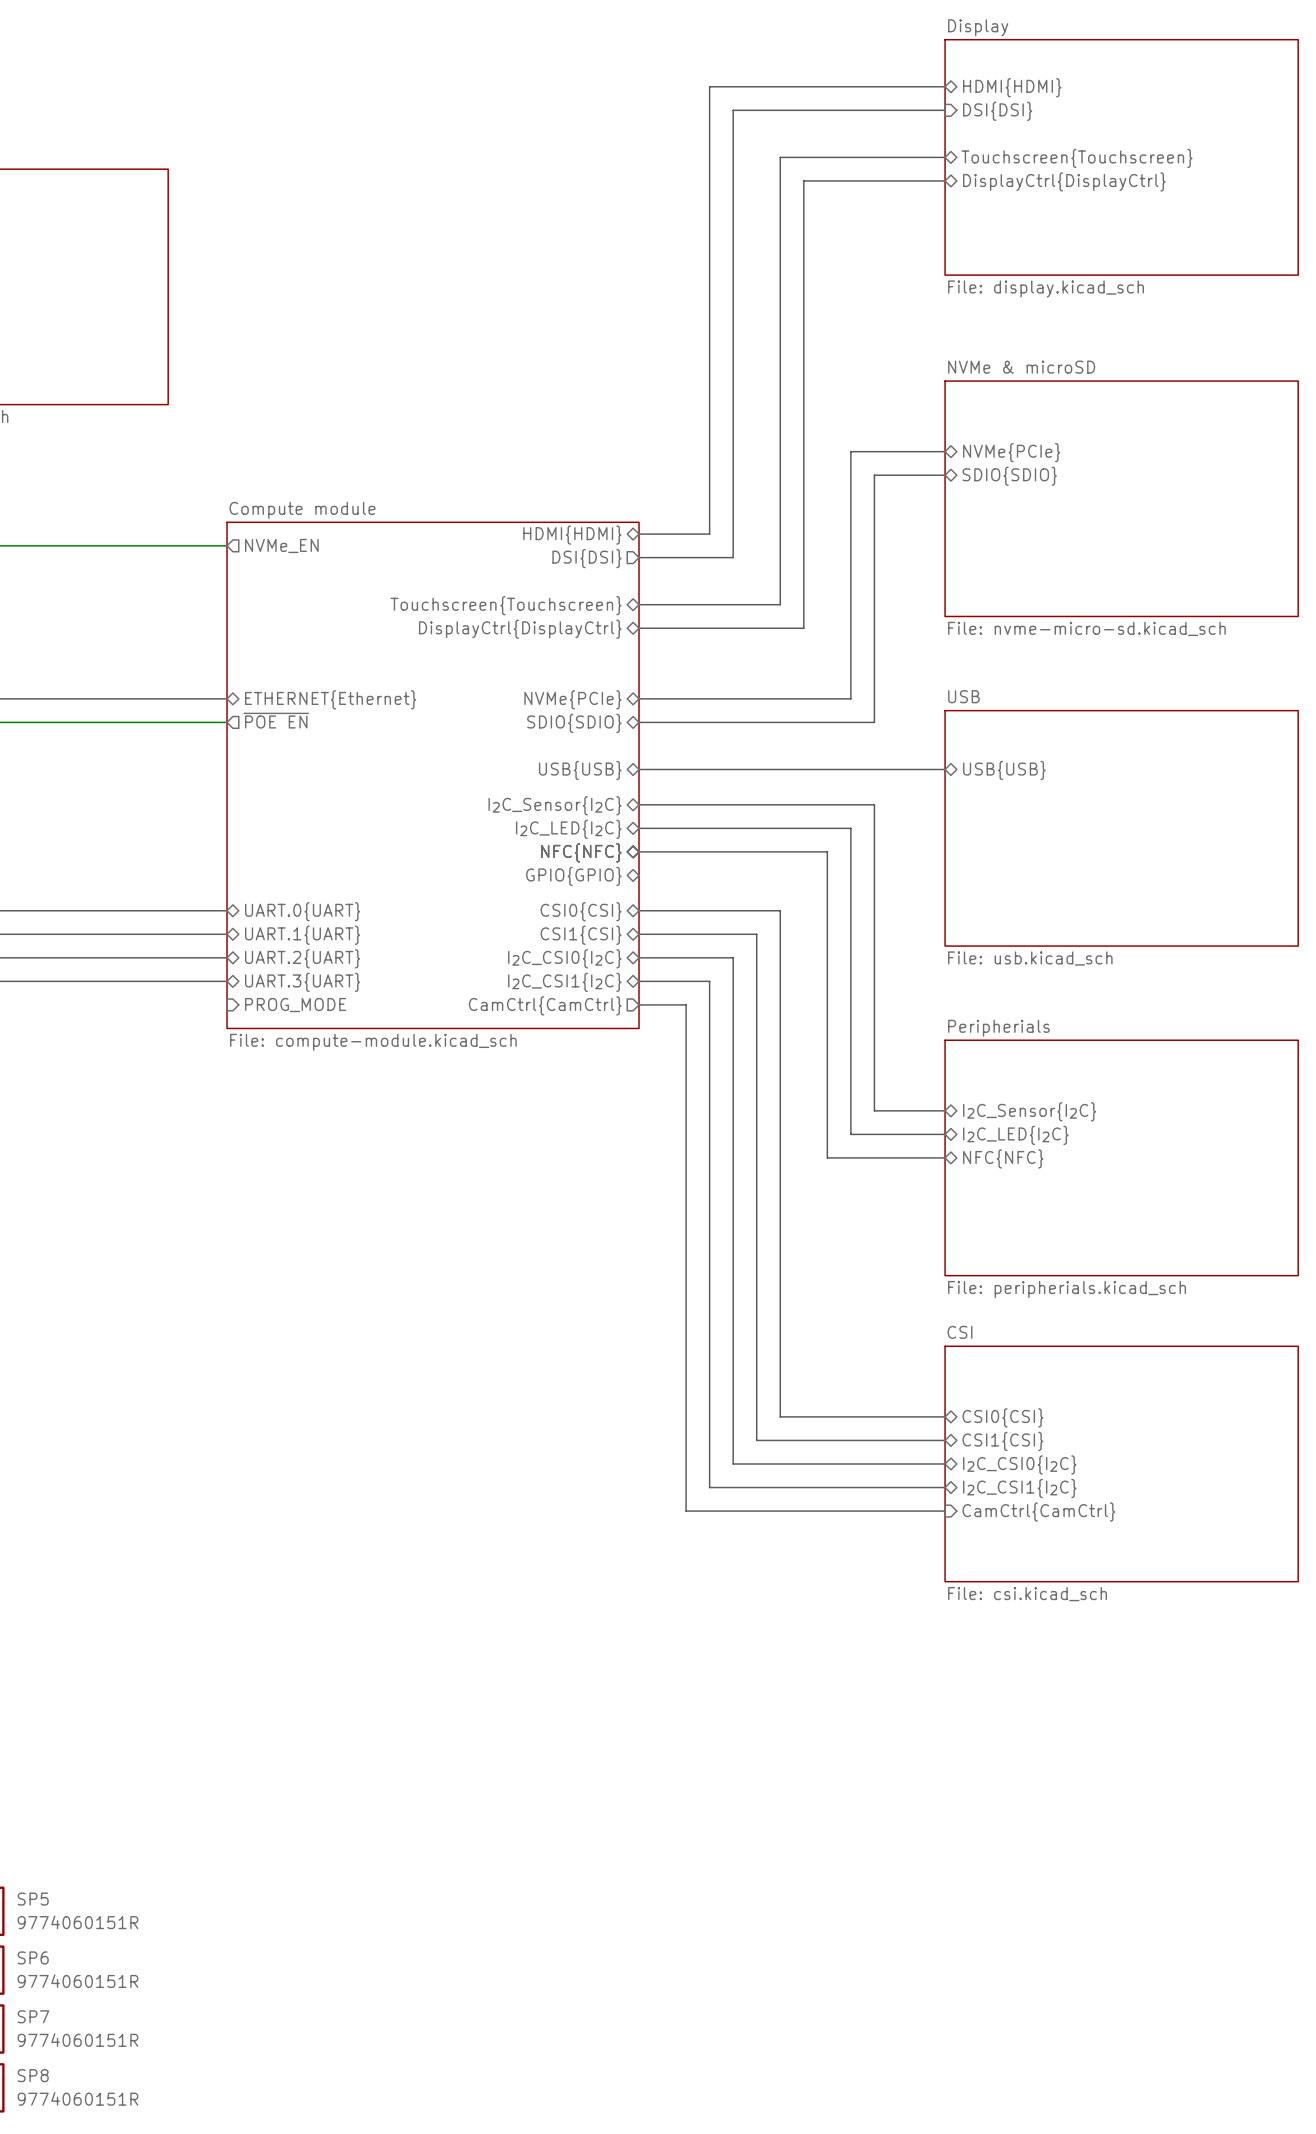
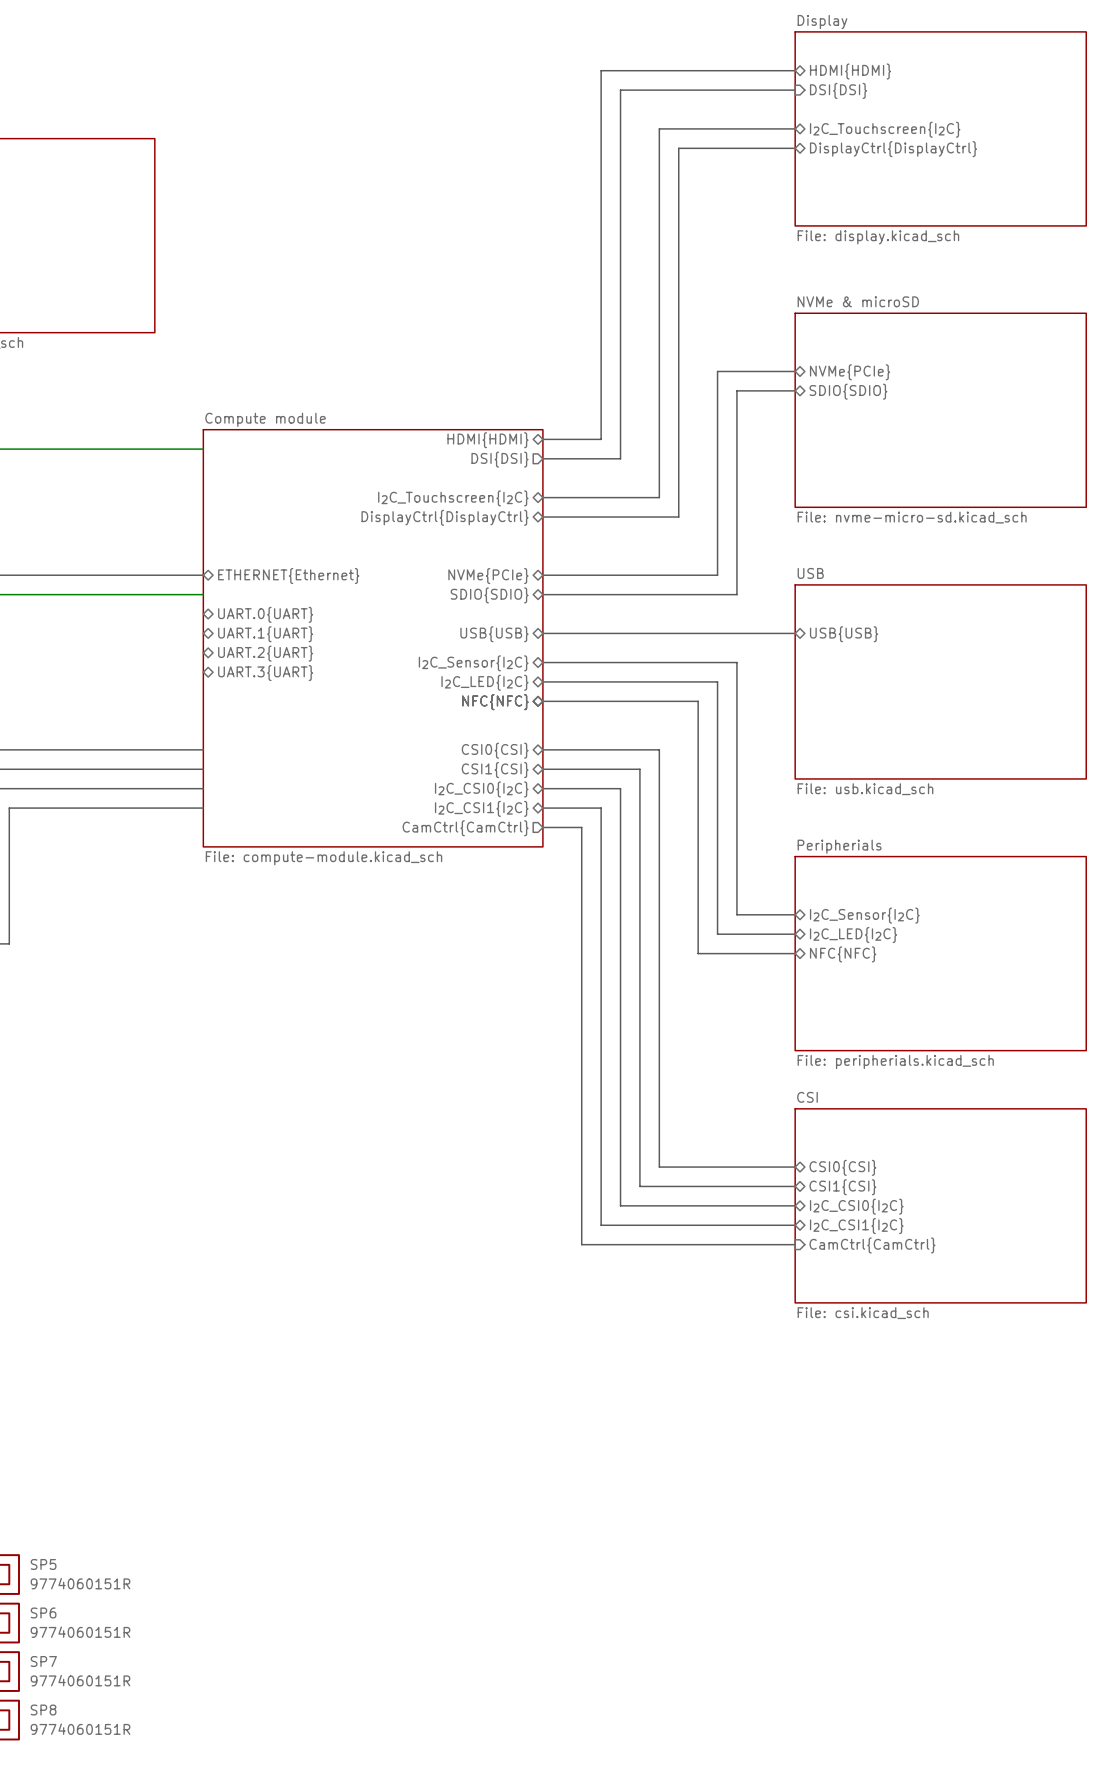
sheet pin: Touchscreen{Touchscreen} (1076, 158) -> I2C_Touchscreen{I2C} (885, 129)
sheet pin: NVMe_EN (281, 545) -> none
sheet pin: Touchscreen{Touchscreen} (505, 605) -> I2C_Touchscreen{I2C} (453, 498)
sheet pin: ~{POE EN} (276, 720) -> none
sheet pin: GPIO{GPIO} (573, 876) -> none
sheet pin position: UART.0{UART} (302, 911) -> UART.0{UART} (265, 614)
sheet pin position: UART.1{UART} (302, 935) -> UART.1{UART} (265, 634)
sheet pin position: UART.2{UART} (302, 958) -> UART.2{UART} (265, 653)
sheet pin position: UART.3{UART} (302, 982) -> UART.3{UART} (265, 673)
sheet pin: PROG_MODE (295, 1005) -> none

